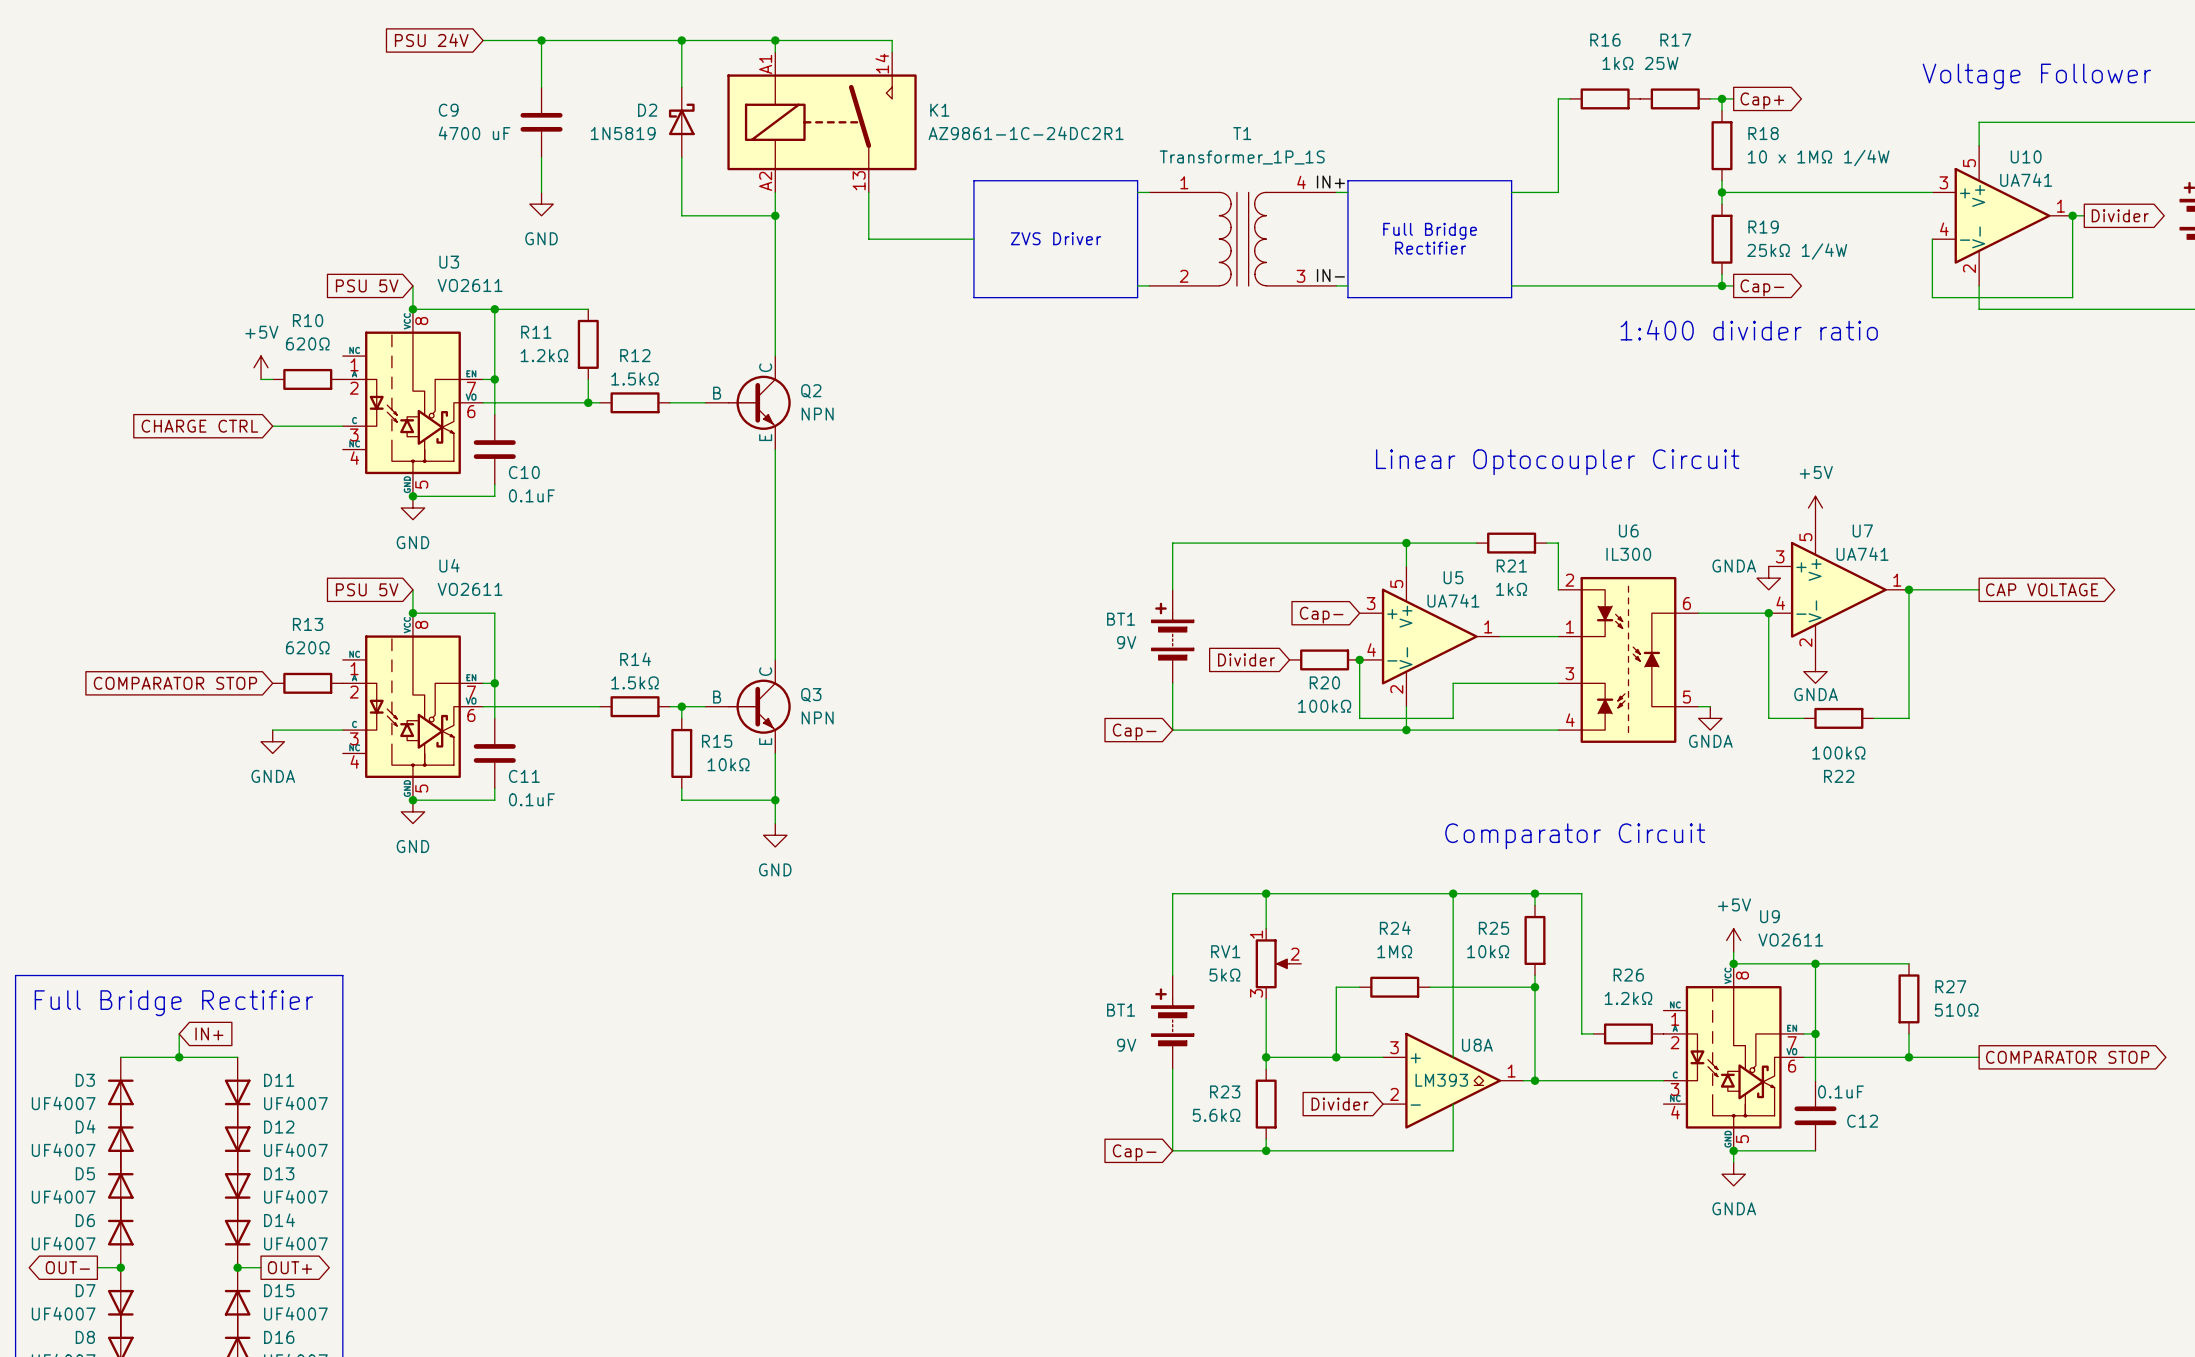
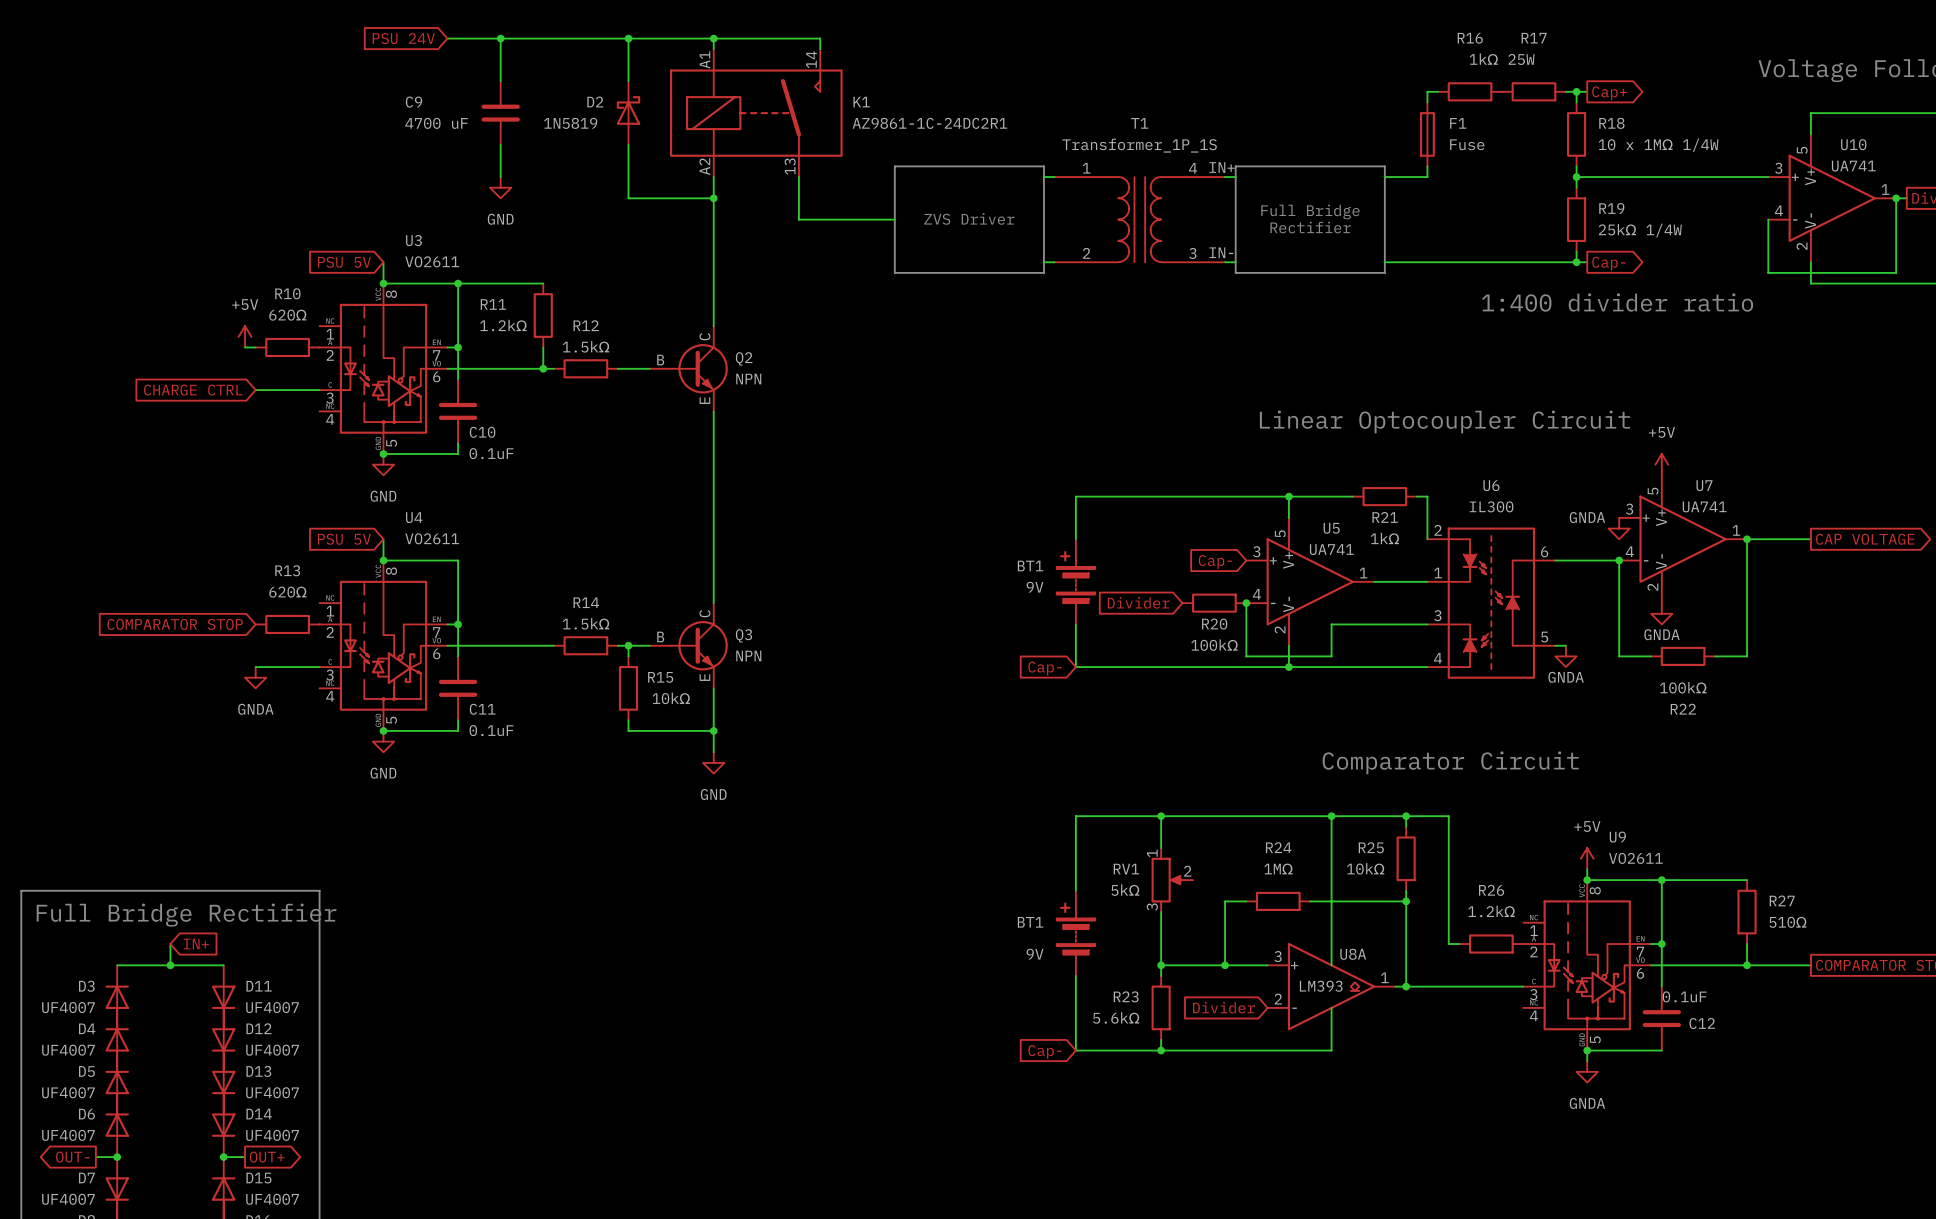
F1: none -> Fuse (1427, 134)

